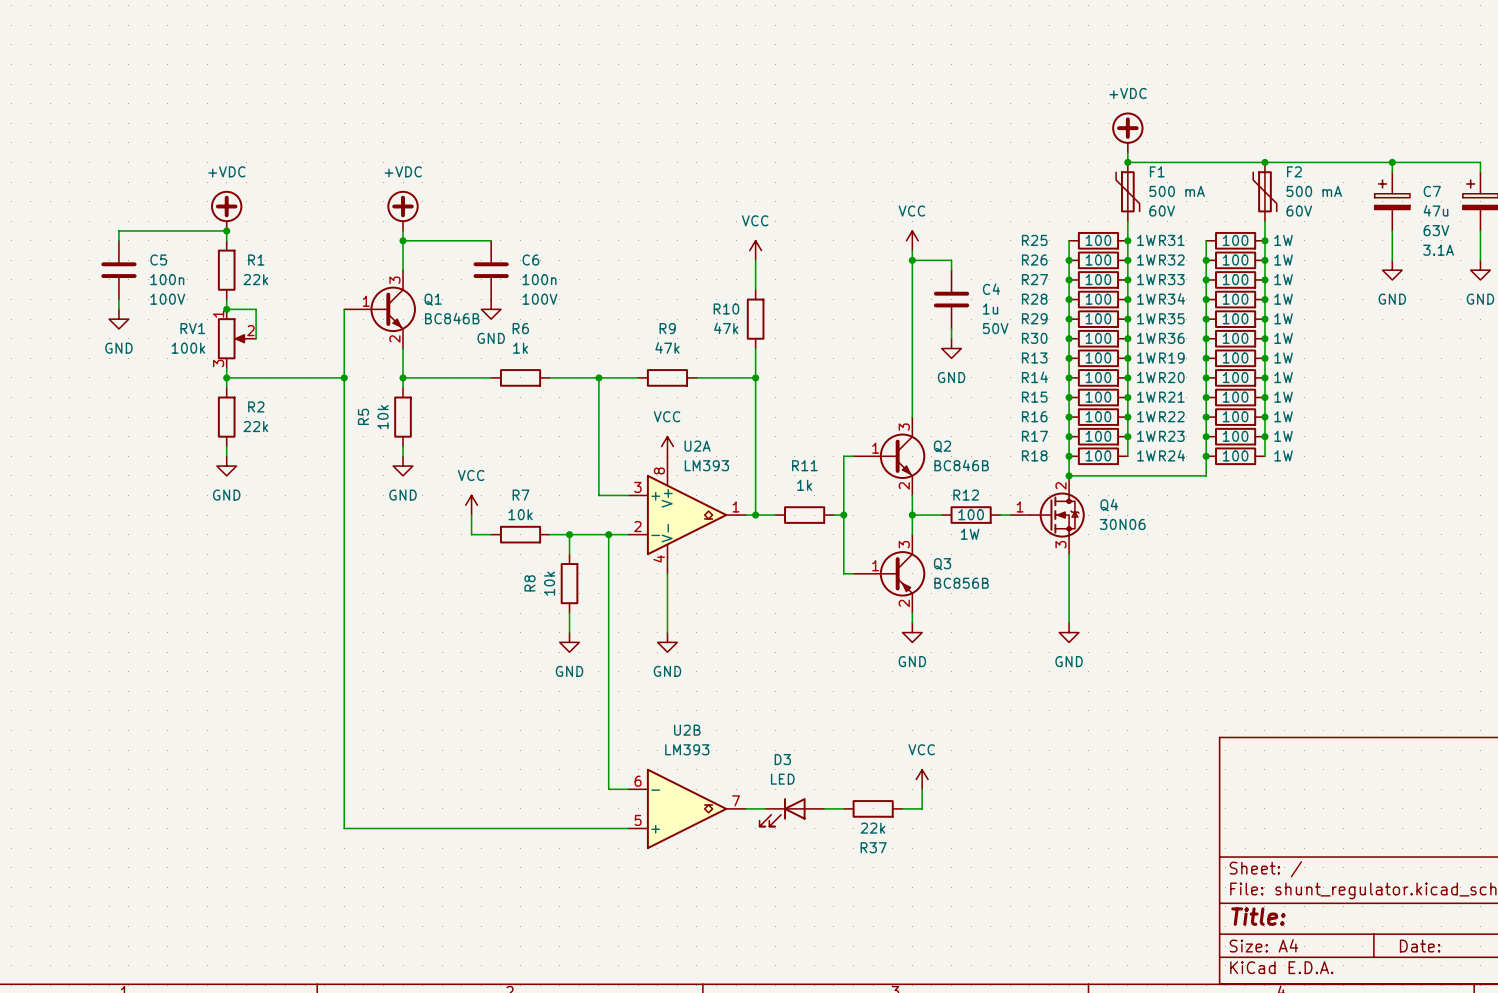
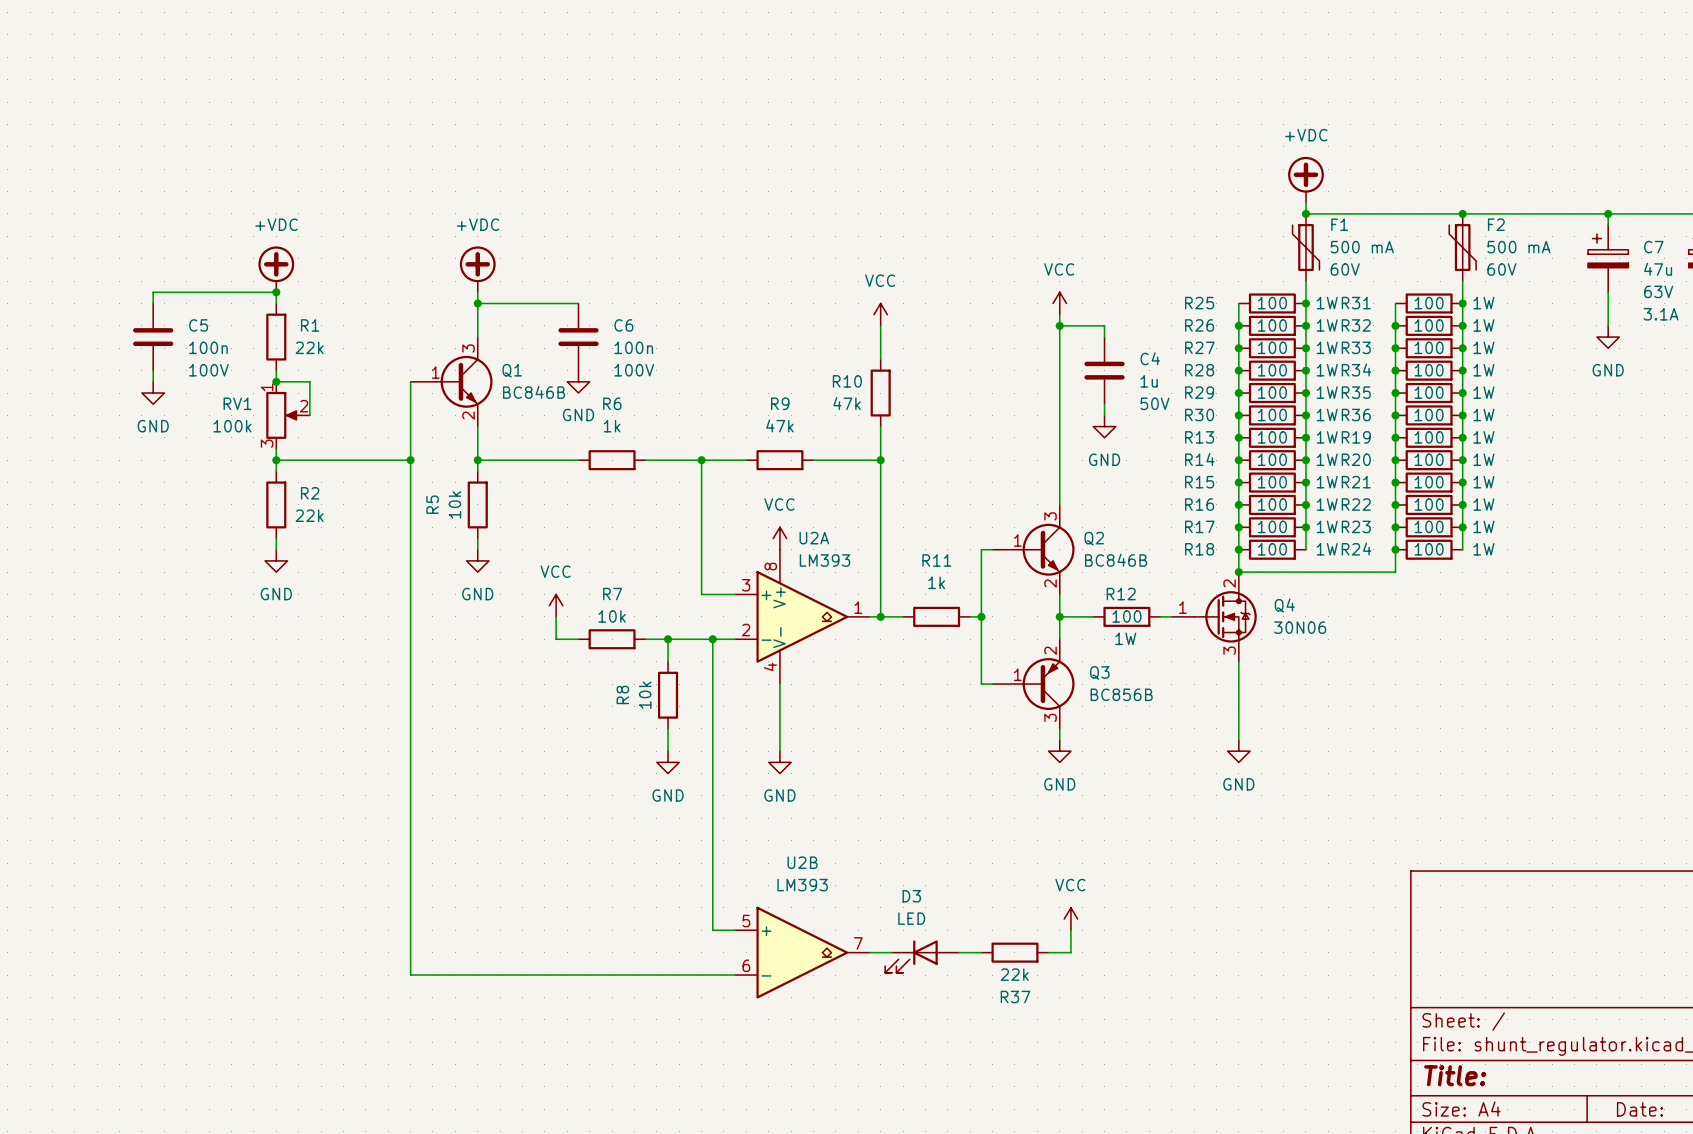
Q3 flip: as is (902, 573) -> up-down (1048, 684)
U2B flip: as is (687, 808) -> up-down (802, 952)

